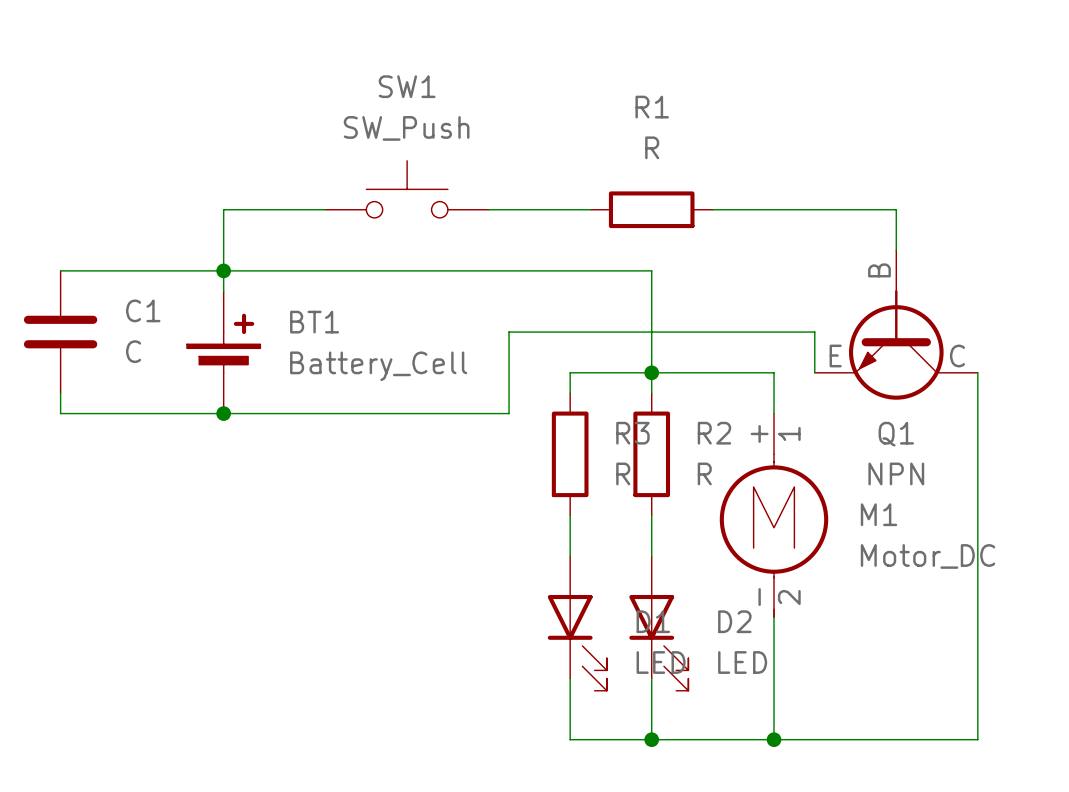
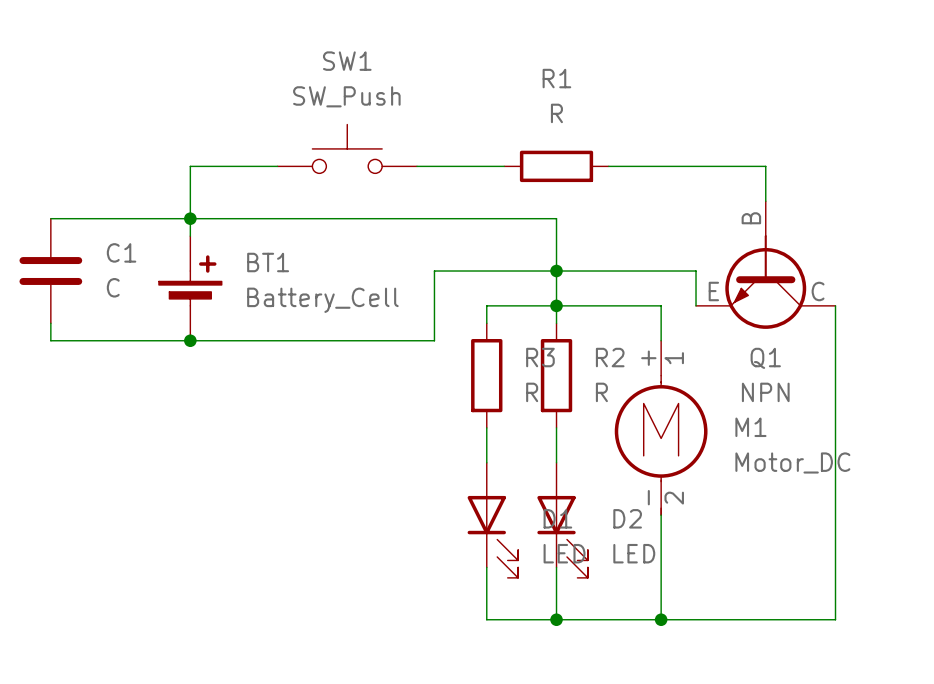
junction: none -> (556, 271)

